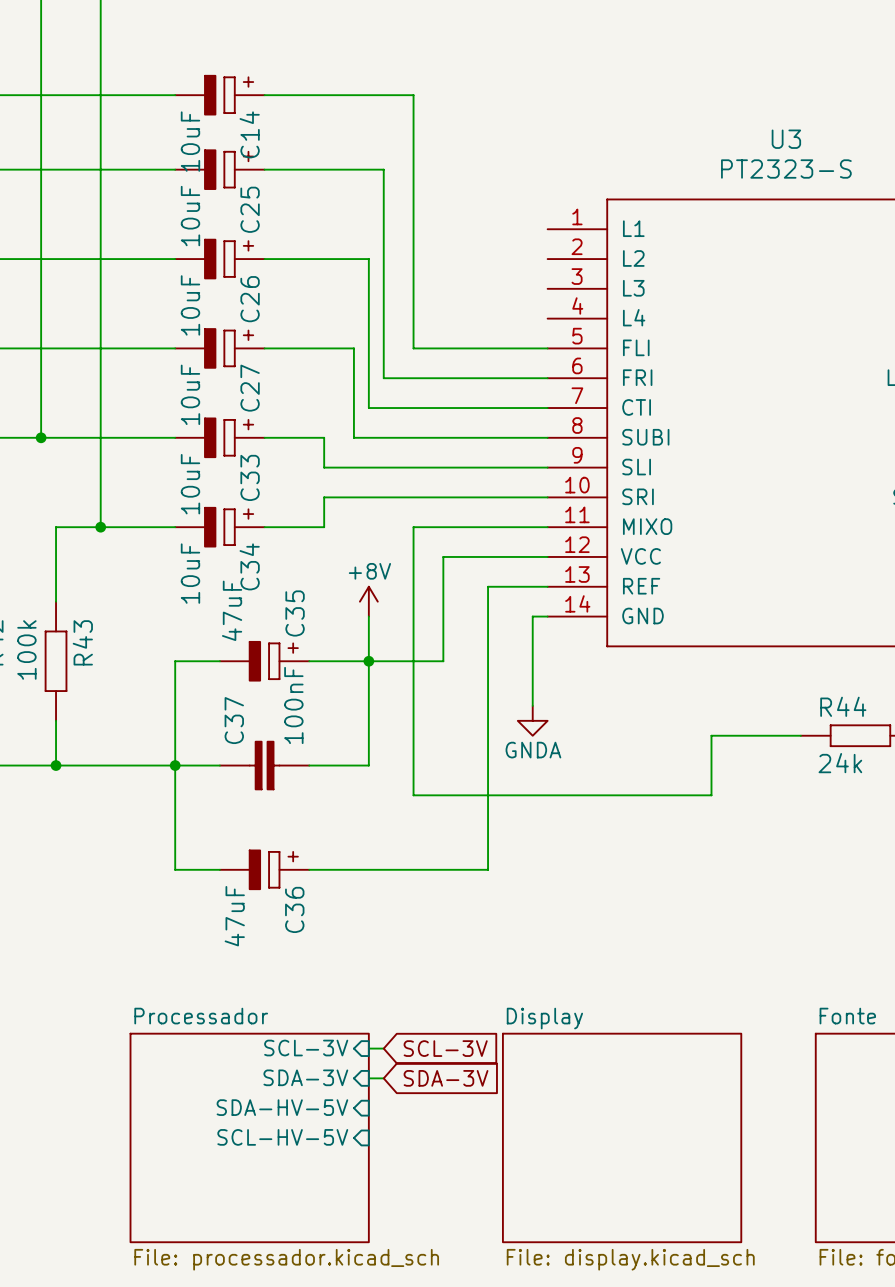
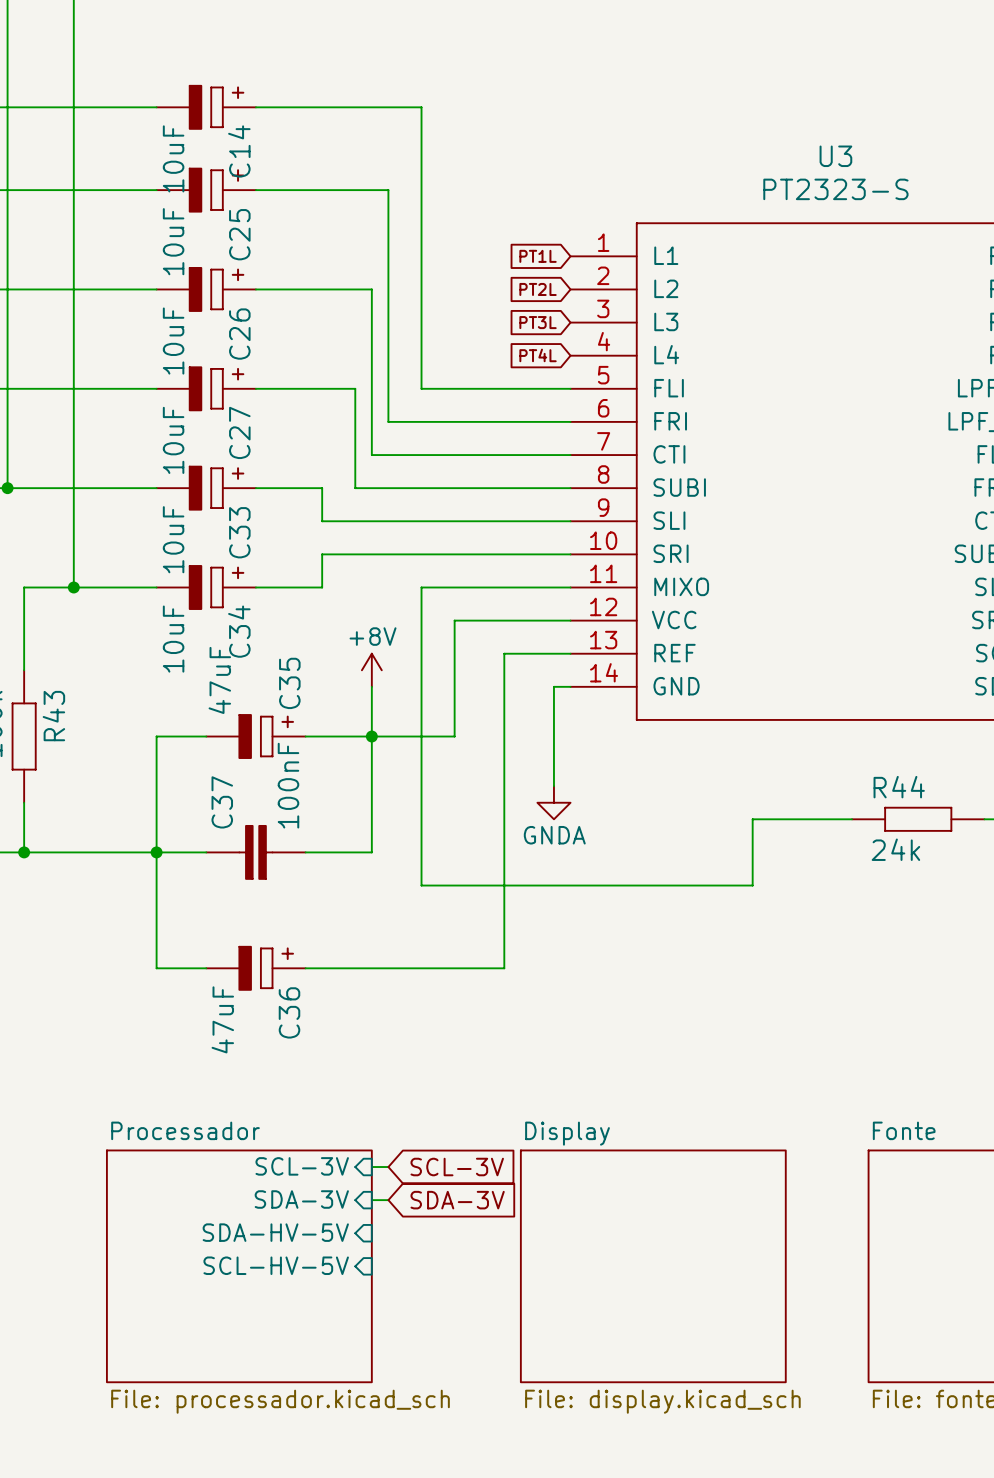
global label: none -> PT1L (538, 256)
global label: none -> PT2L (538, 289)
global label: none -> PT3L (538, 322)
global label: none -> PT4L (538, 355)

